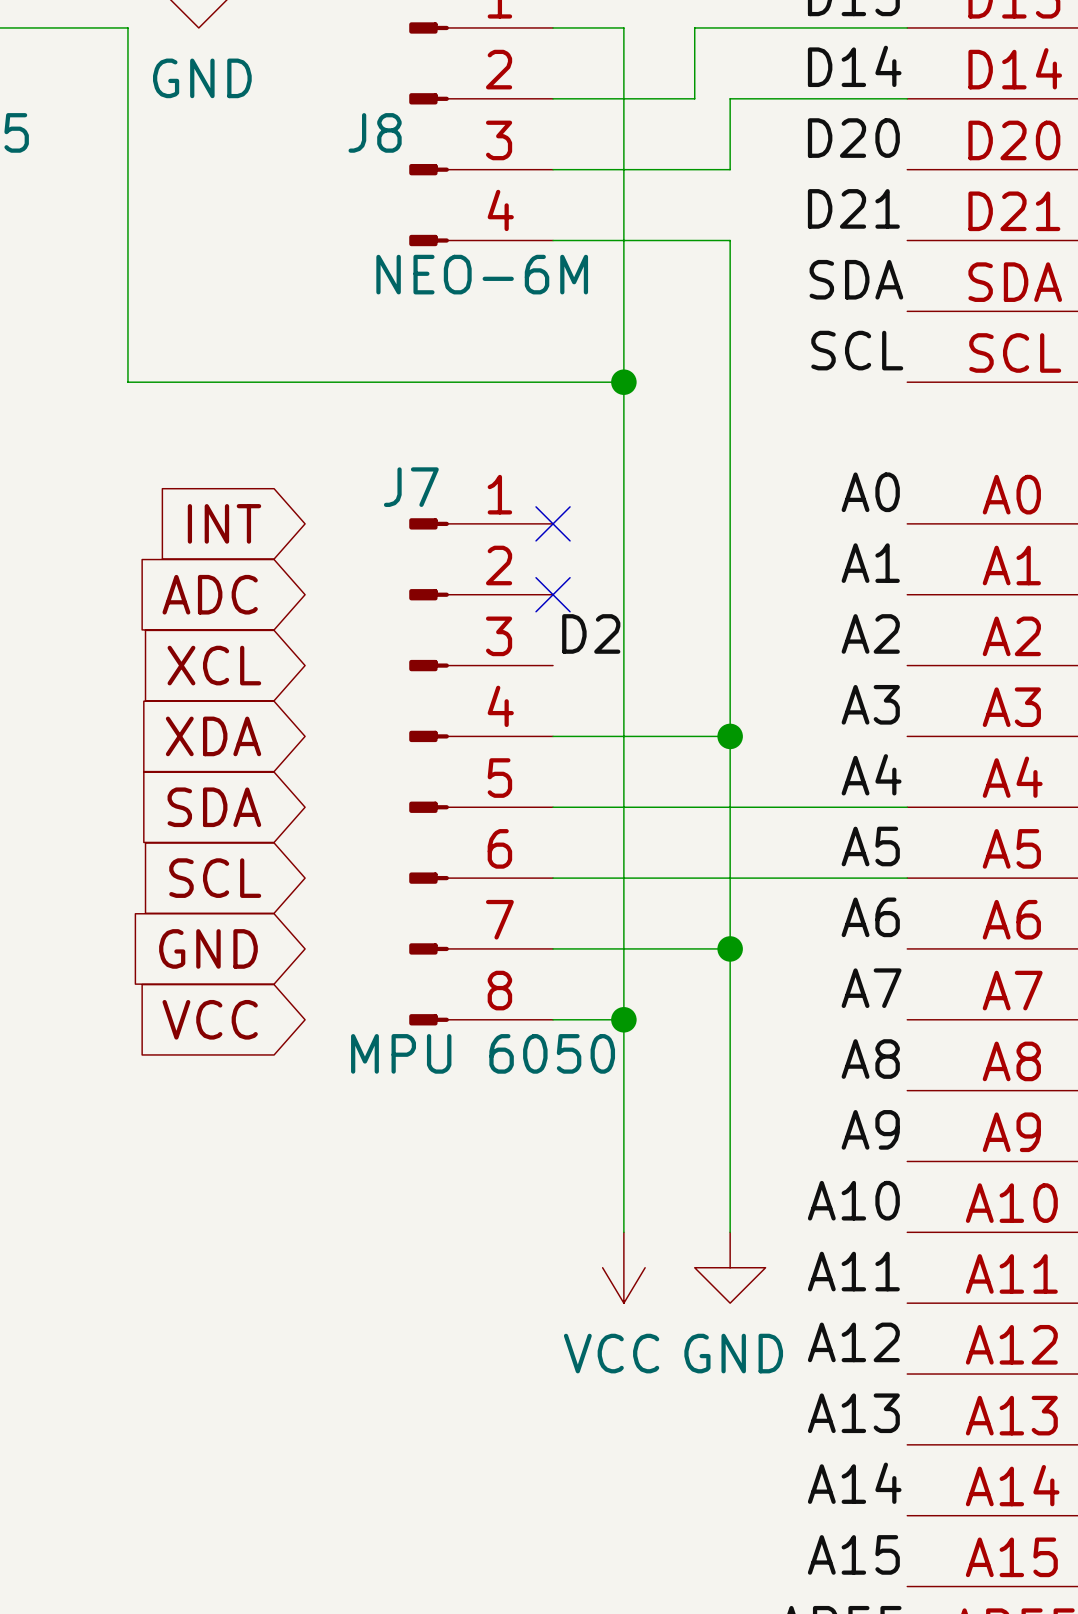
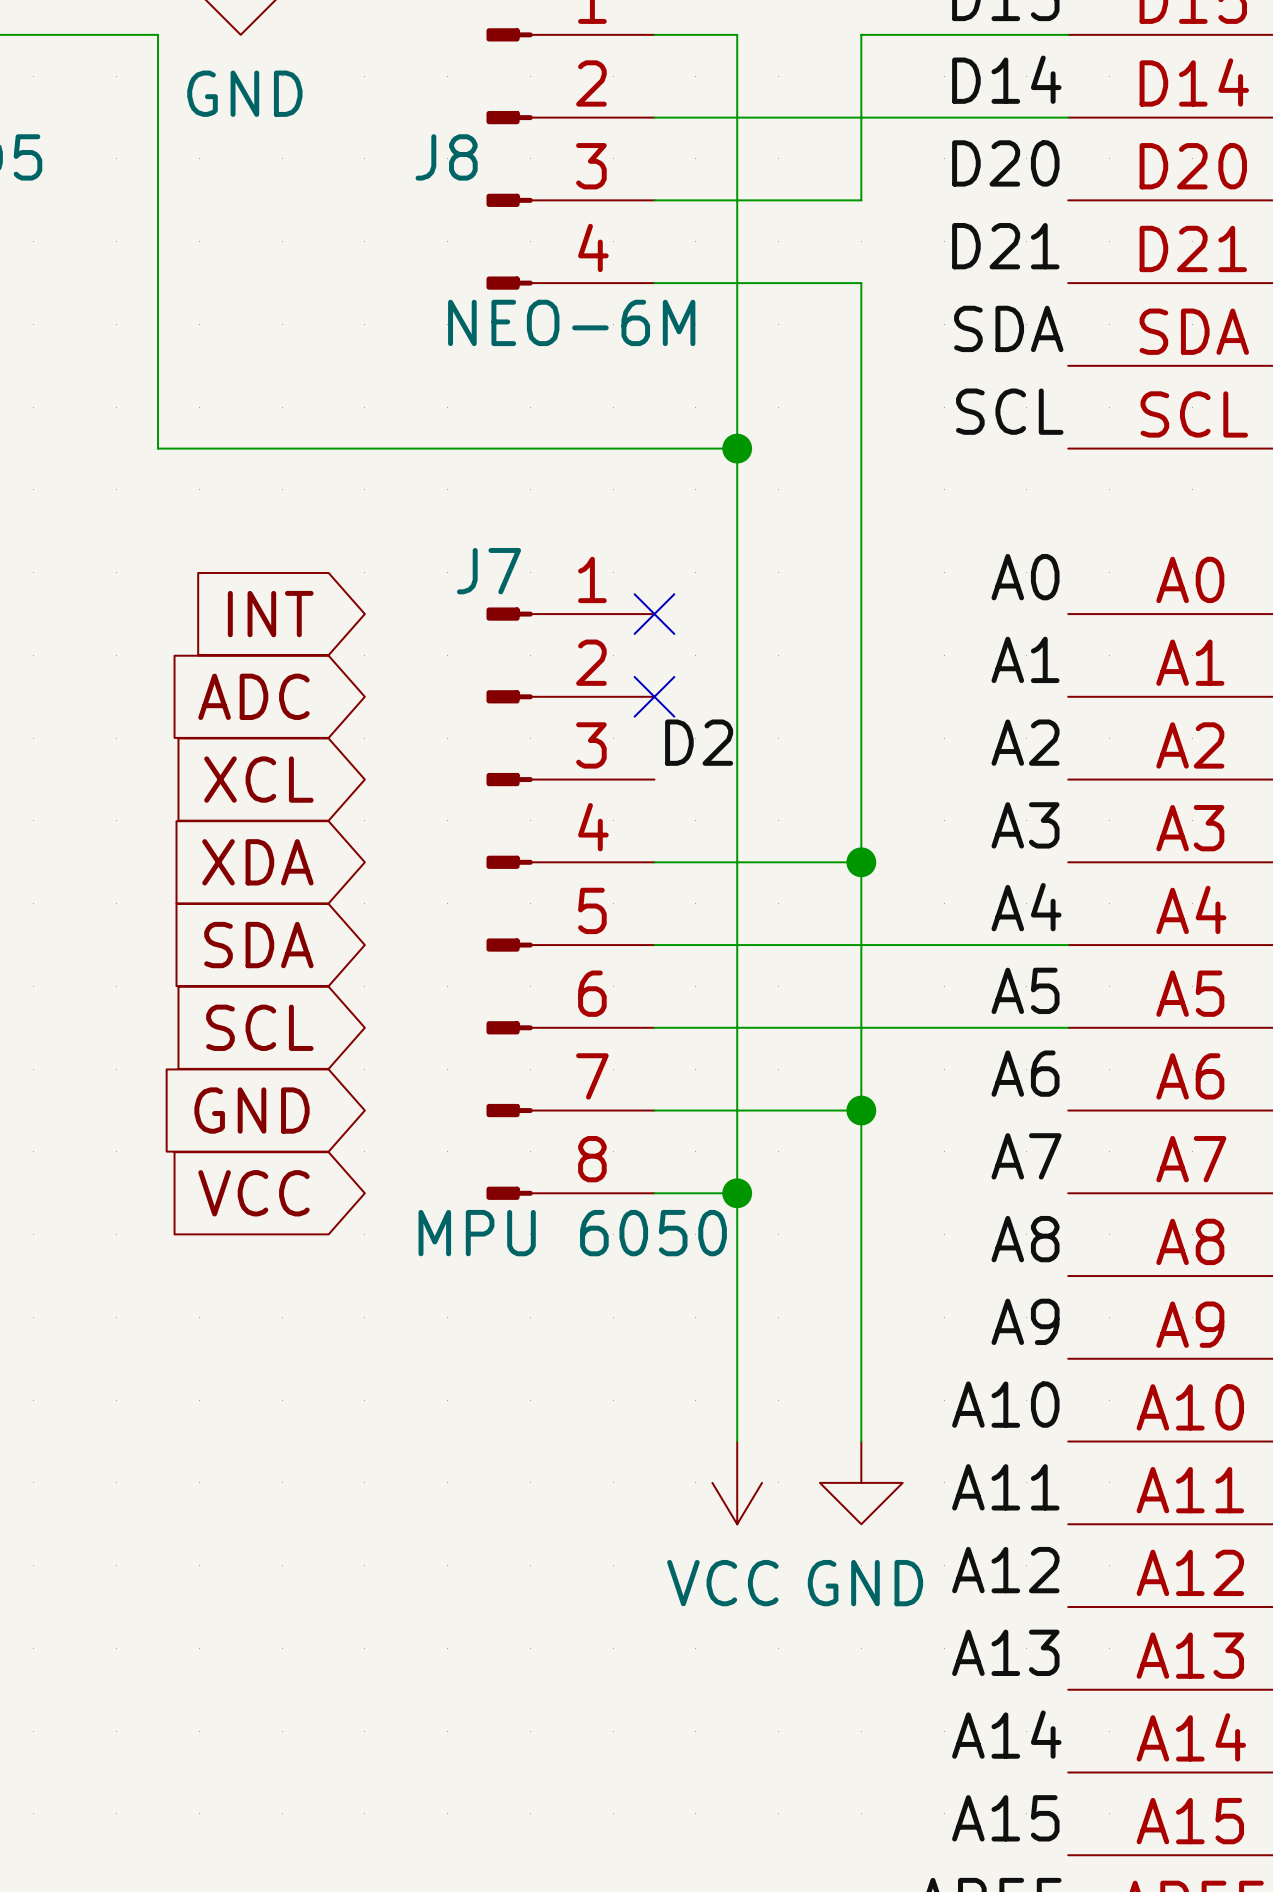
wire: (730, 27) (694, 27) (694, 98) -> (861, 34) (861, 117) (819, 117)

